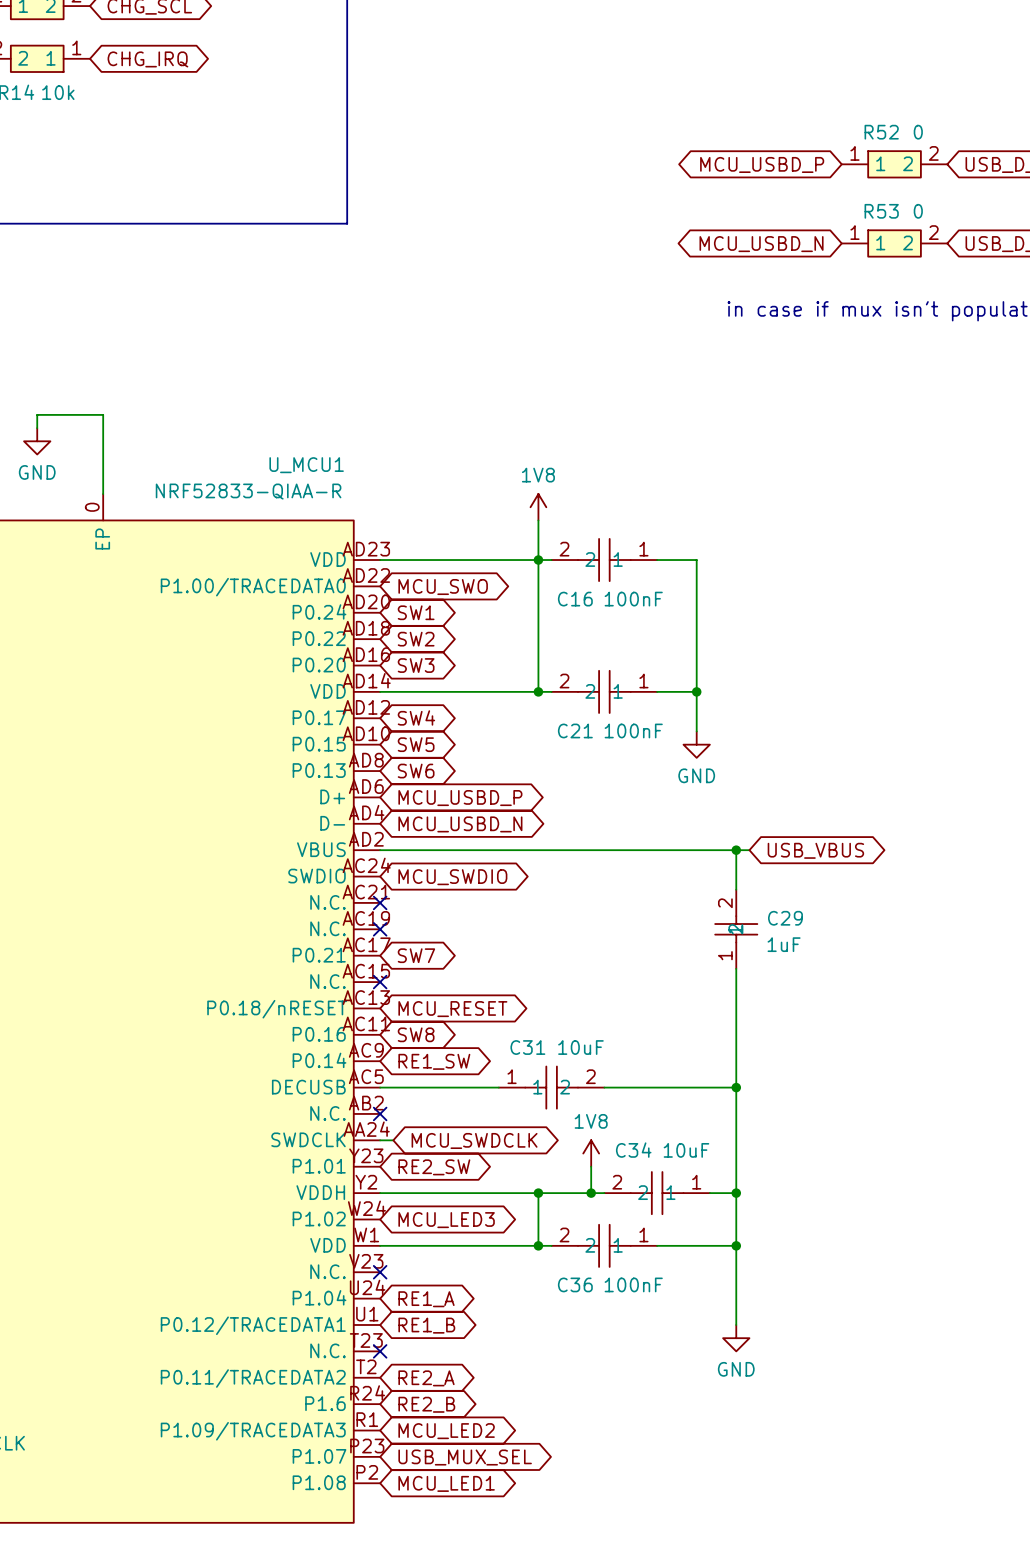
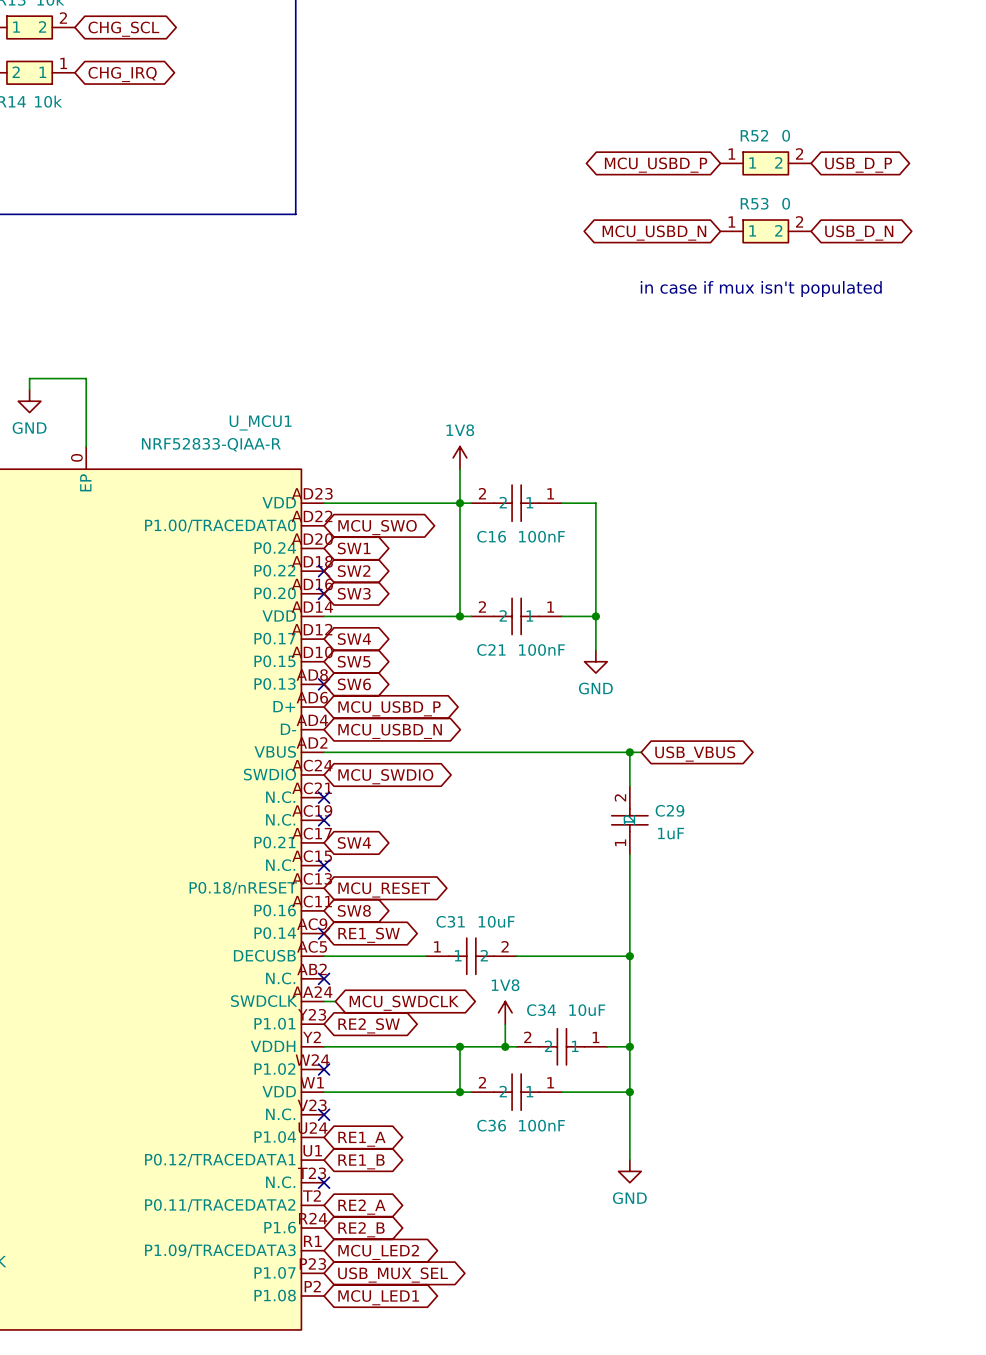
no-connect mark: none -> (324, 571)
no-connect mark: none -> (324, 593)
no-connect mark: none -> (324, 684)
global label: SW7 (416, 955) -> SW4 (354, 842)
no-connect mark: none -> (324, 933)
no-connect mark: none -> (324, 1069)
global label: MCU_LED3 (446, 1220) -> none

